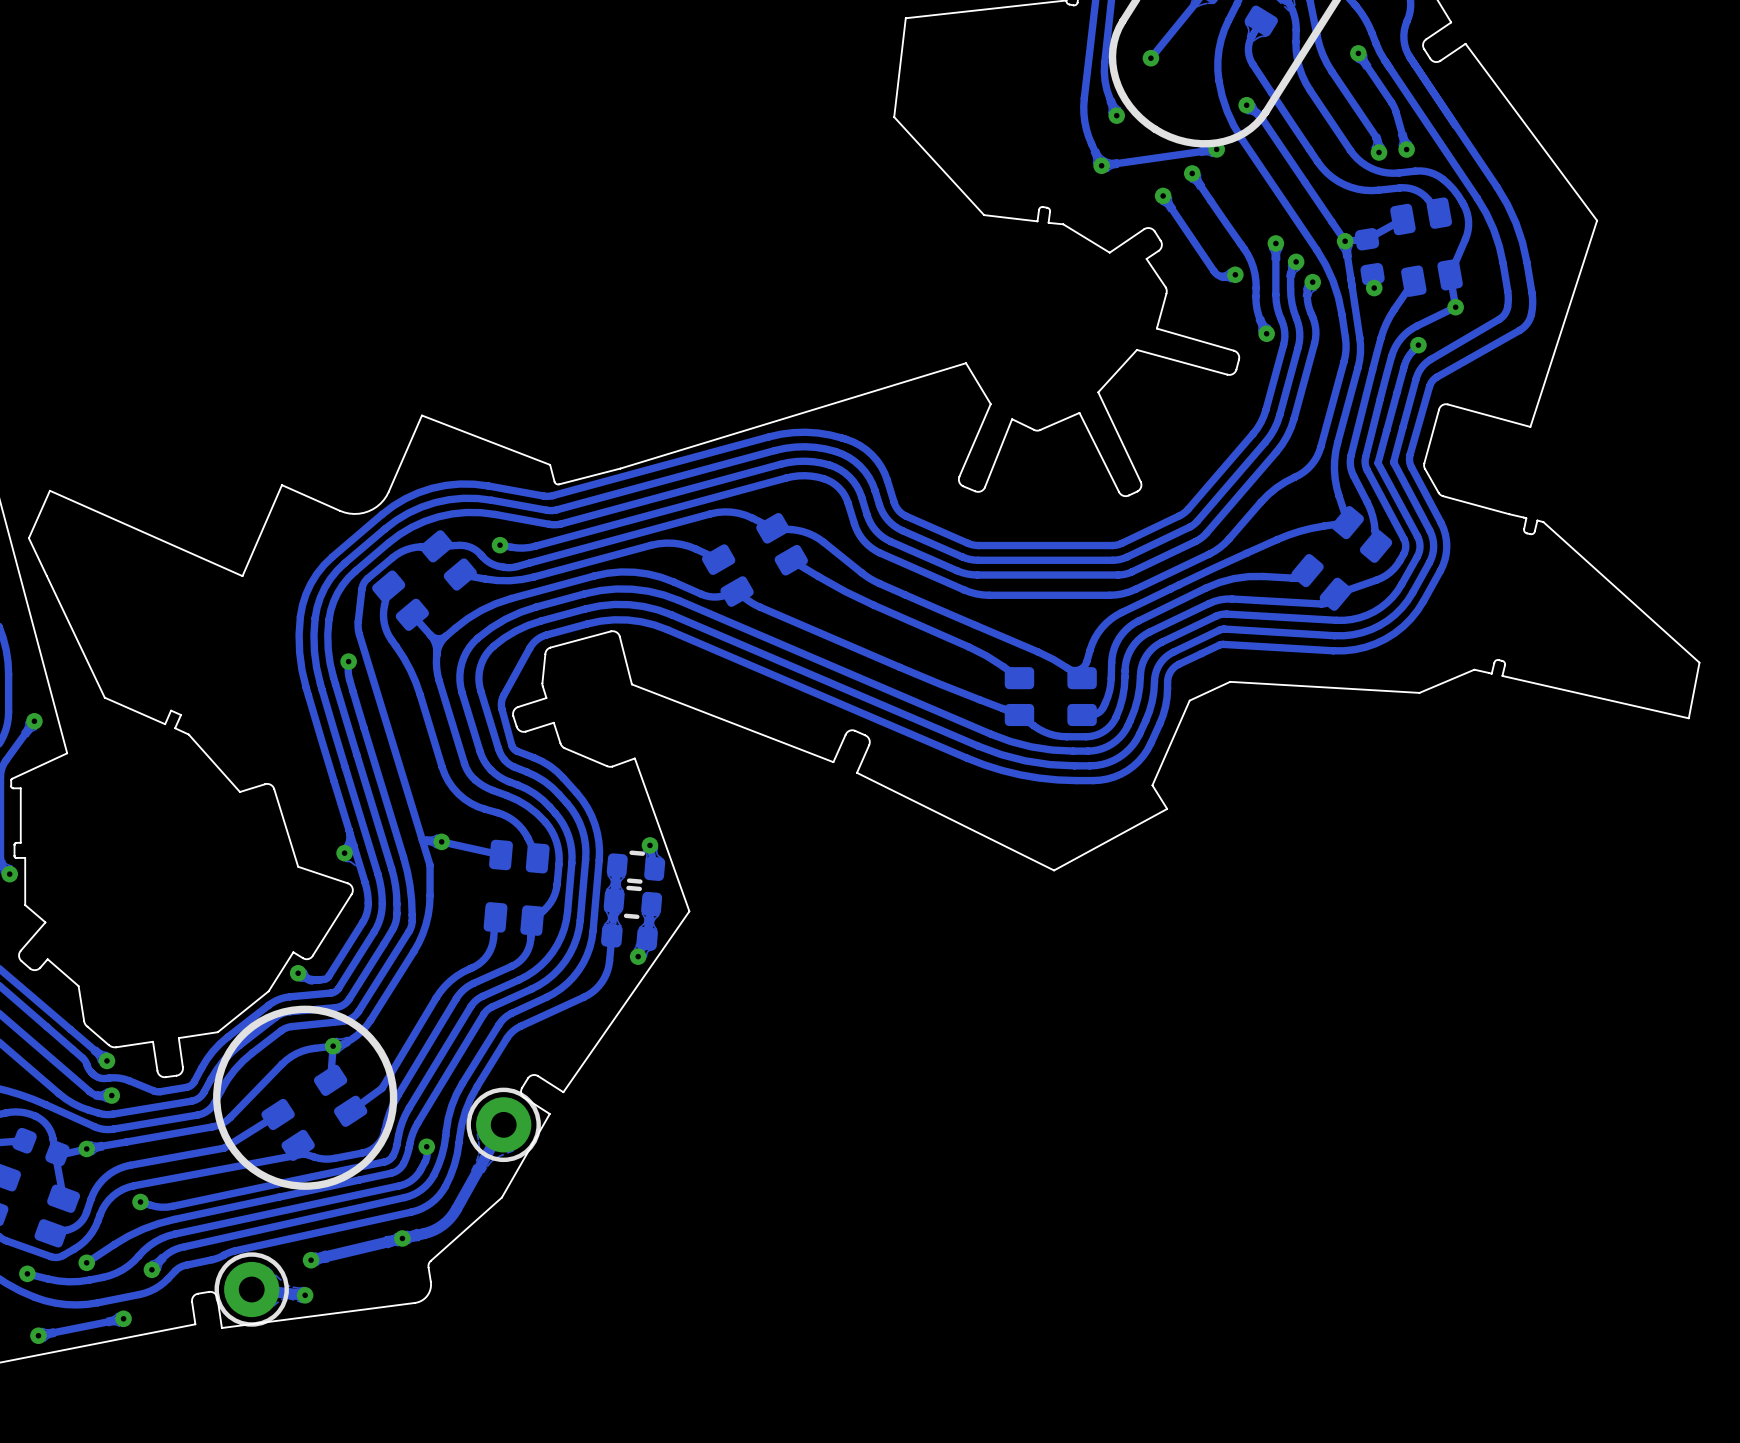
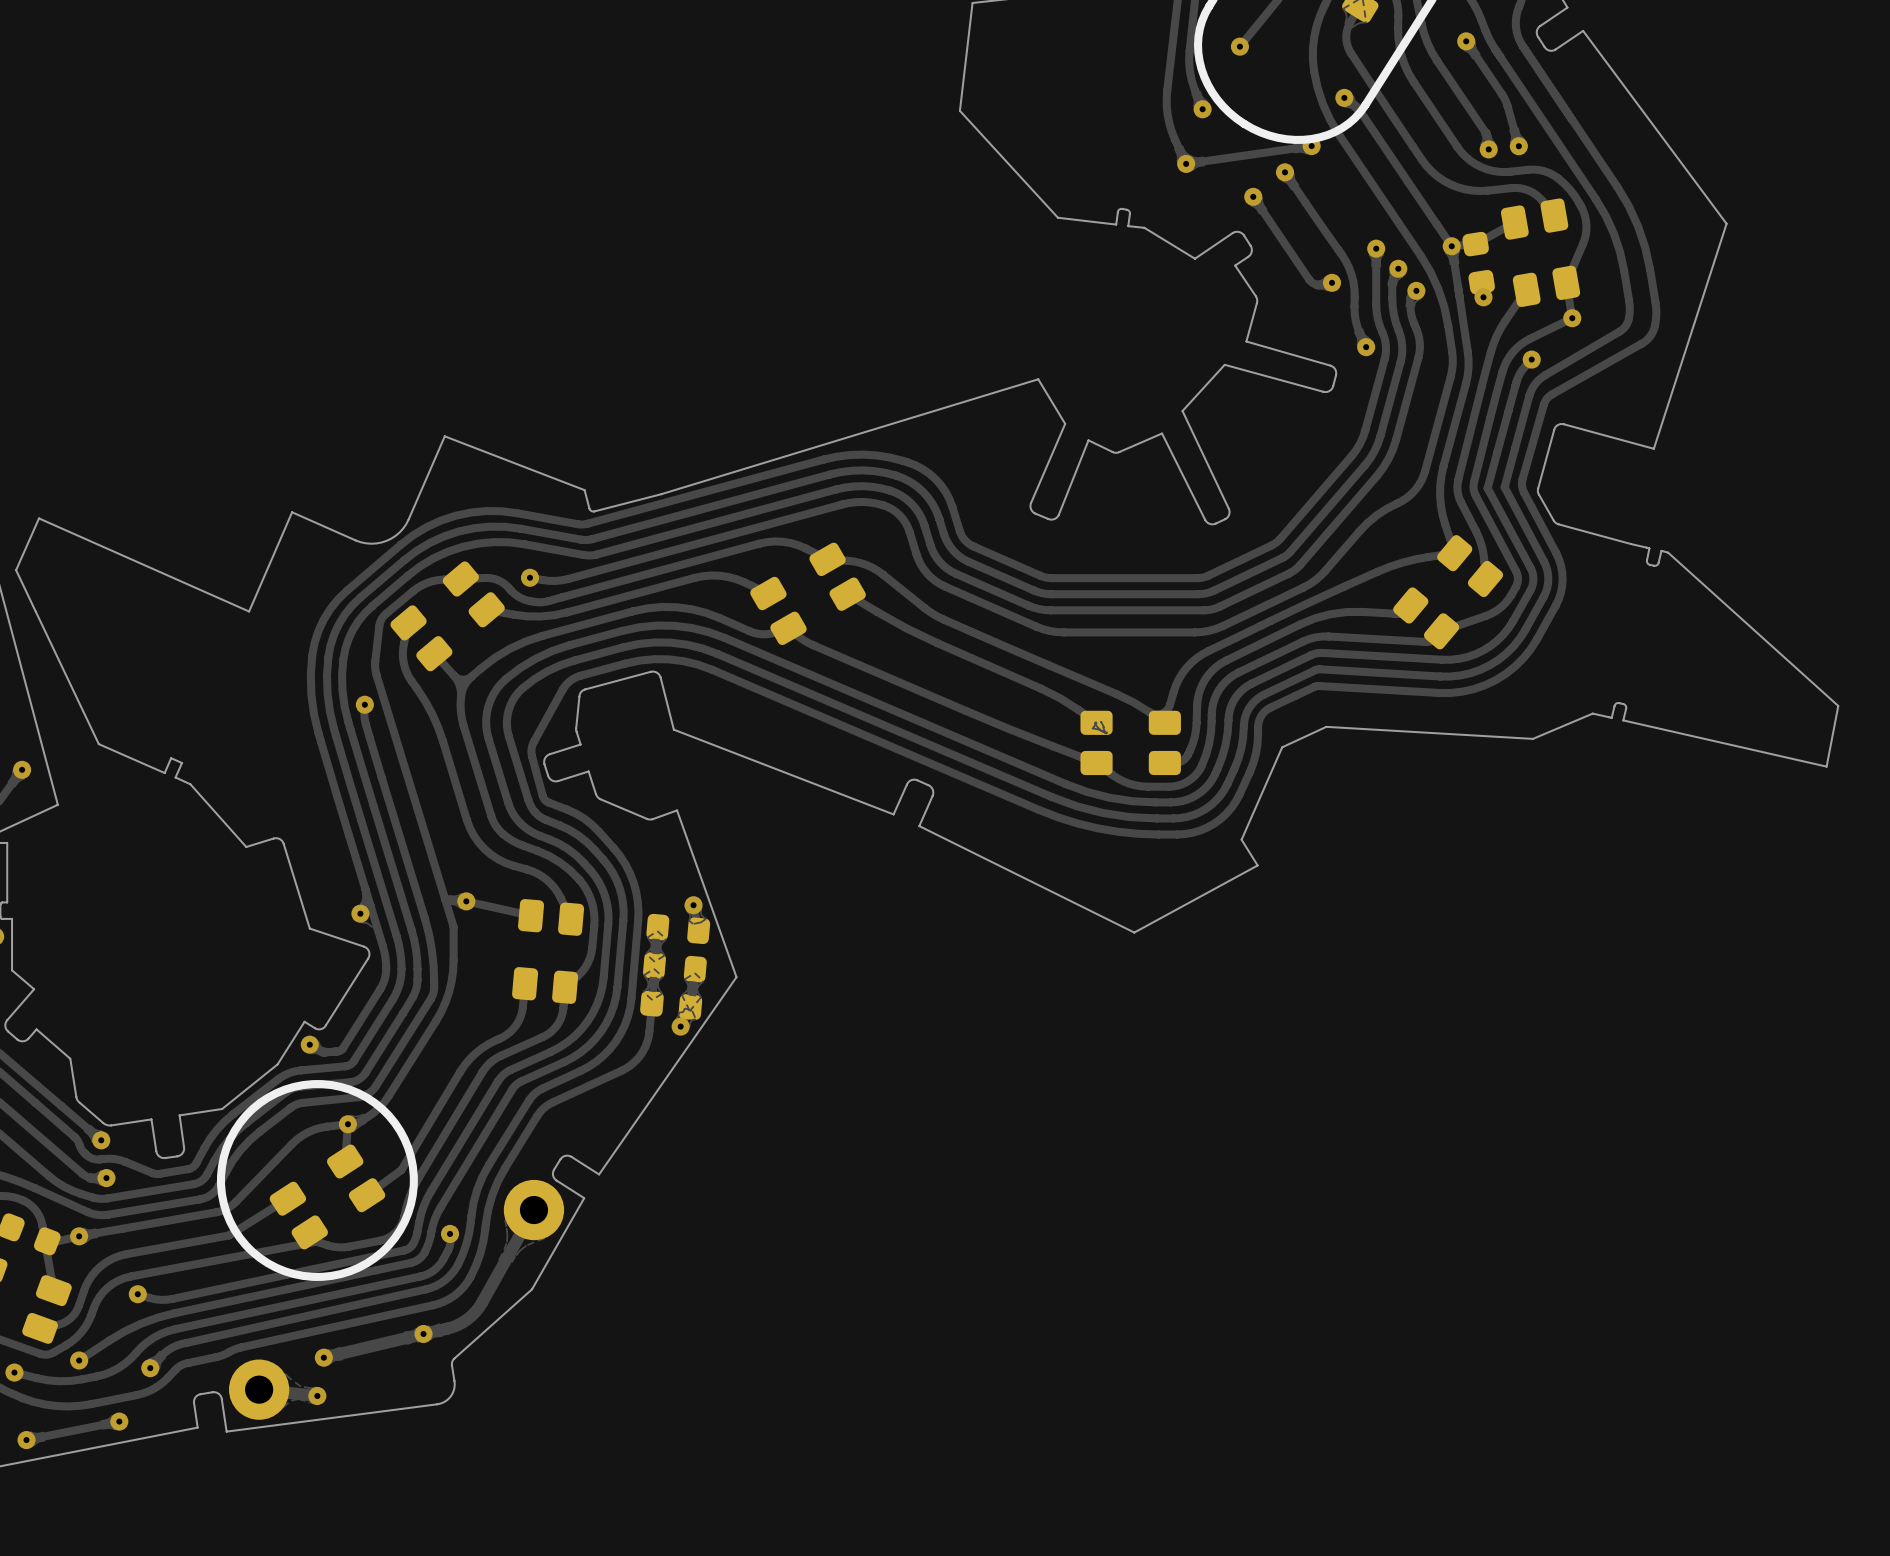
part footprint: [606, 850, 666, 884] -> [646, 913, 711, 945]
part footprint: [603, 885, 663, 920] -> [643, 952, 707, 983]
part footprint: [466, 1087, 541, 1163] -> [503, 1179, 565, 1241]
part footprint: [214, 1252, 289, 1327] -> [229, 1359, 290, 1420]

